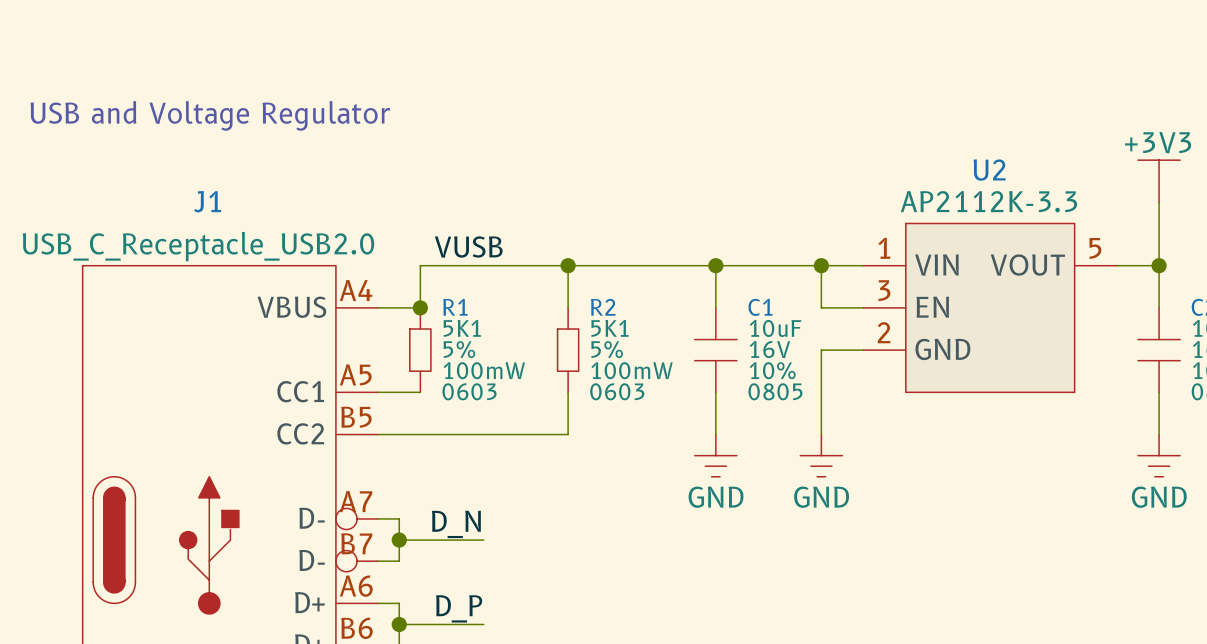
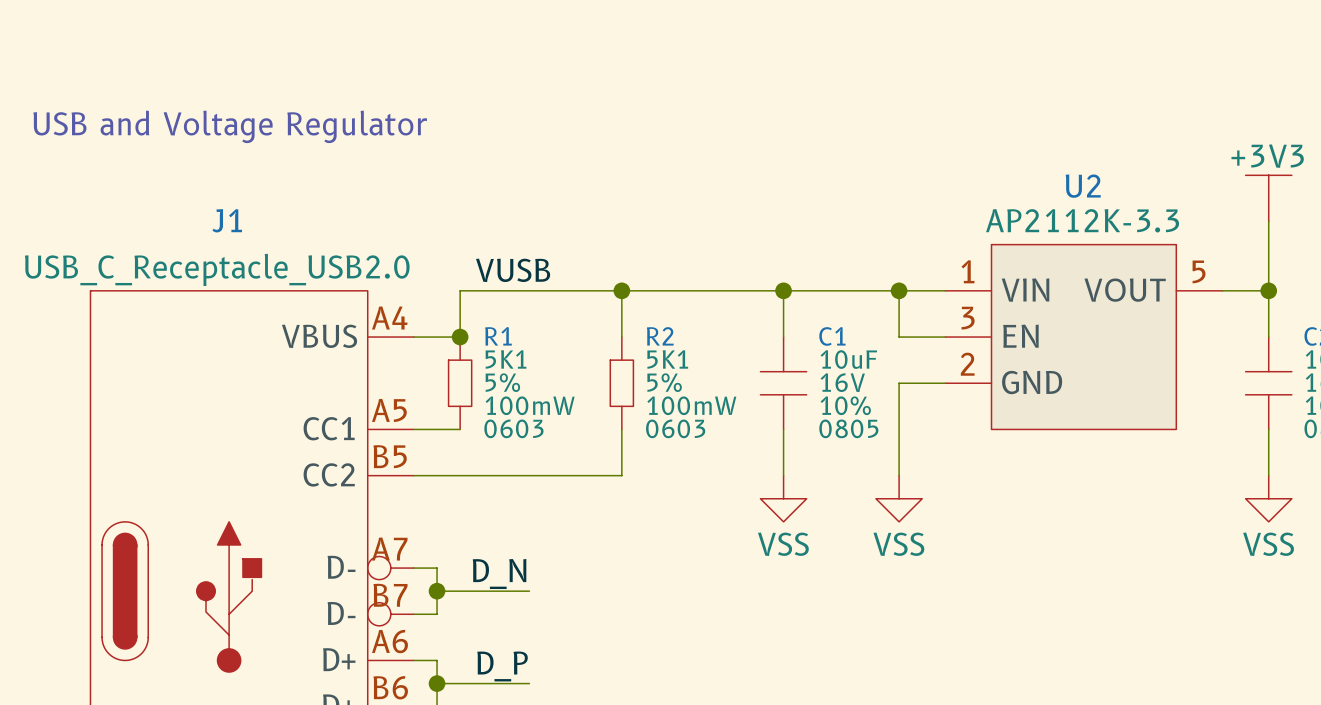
power symbol: GND (715, 455) -> VSS (783, 498)
power symbol: GND (821, 455) -> VSS (899, 498)
power symbol: GND (1159, 455) -> VSS (1268, 498)

